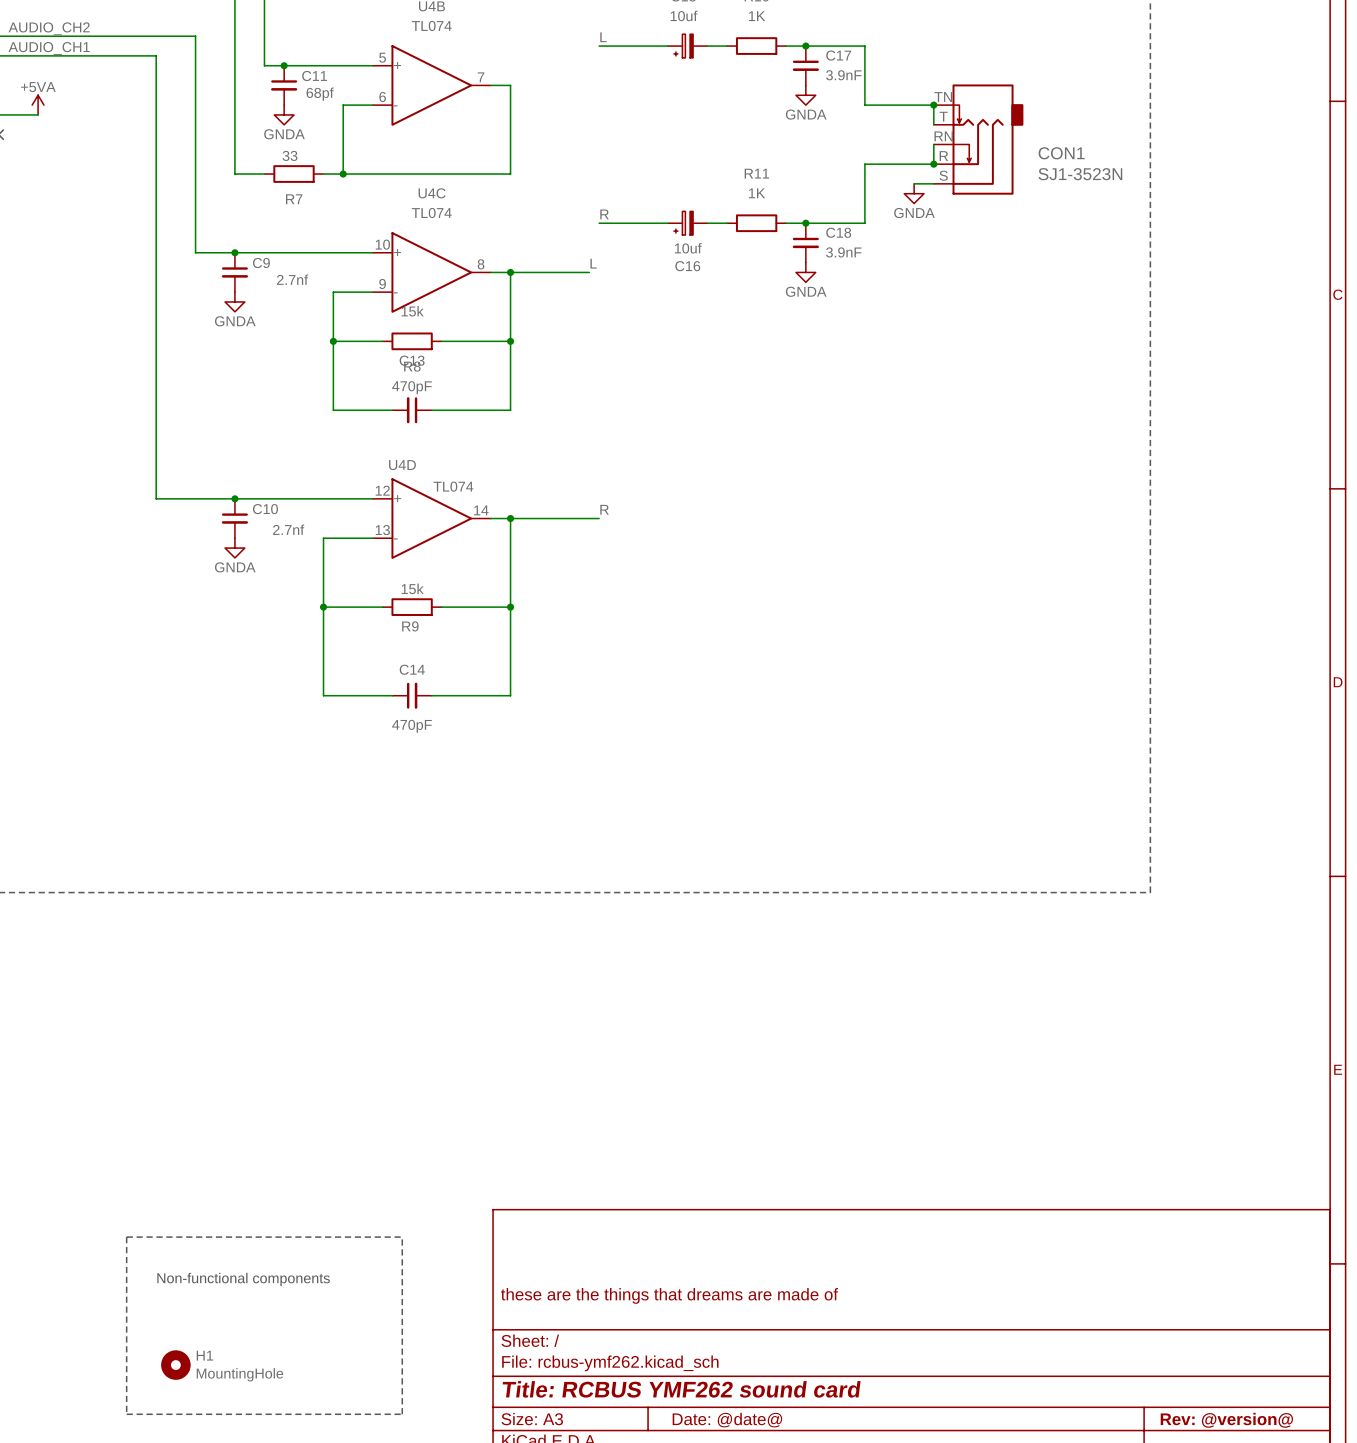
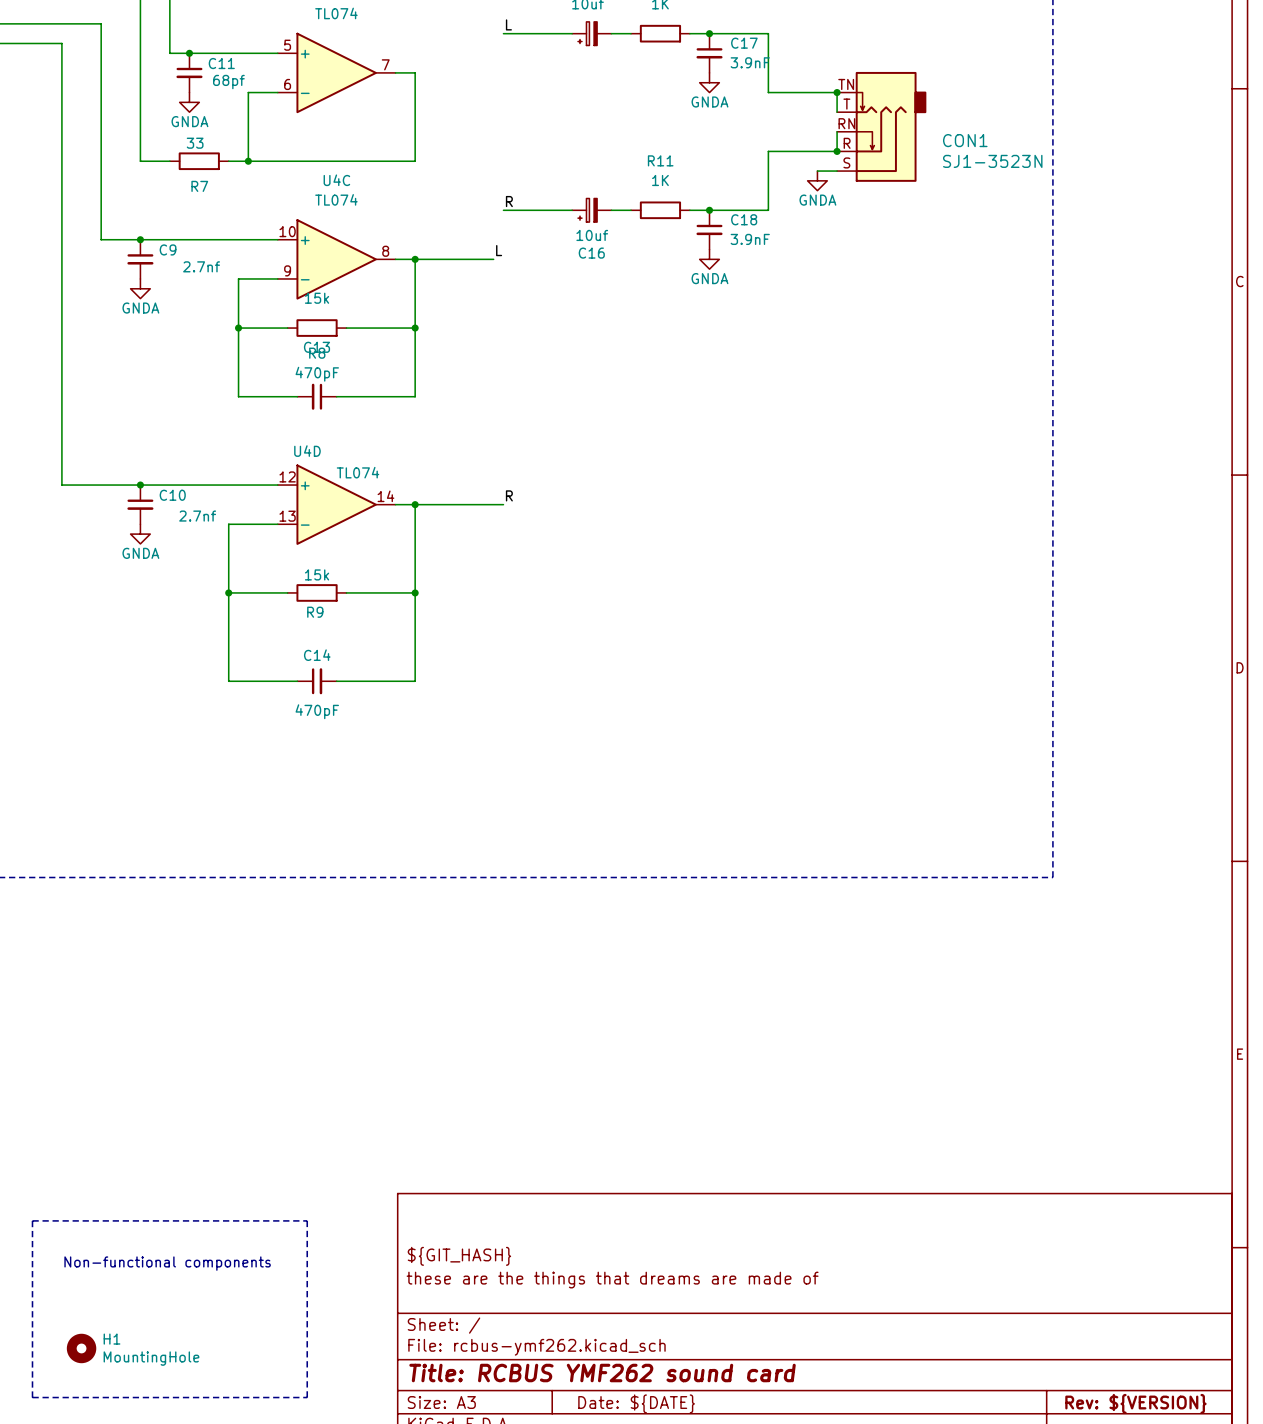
title block: none -> ${GIT_HASH} (459, 1256)
title block: Date: @date@ (727, 1420) -> Date: ${DATE} (636, 1403)
title block: Rev: @version@ (1226, 1420) -> Rev: ${VERSION} (1135, 1403)

